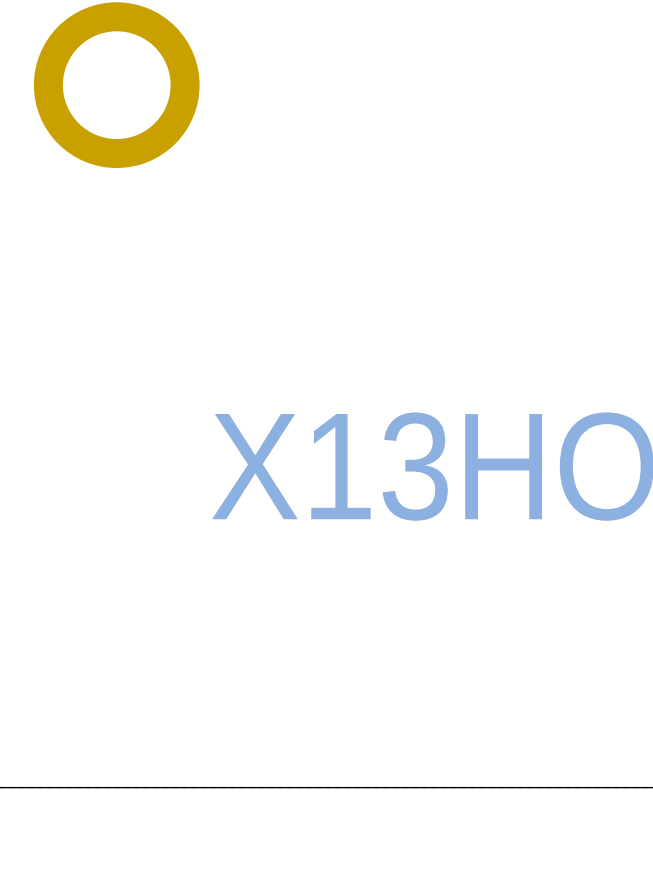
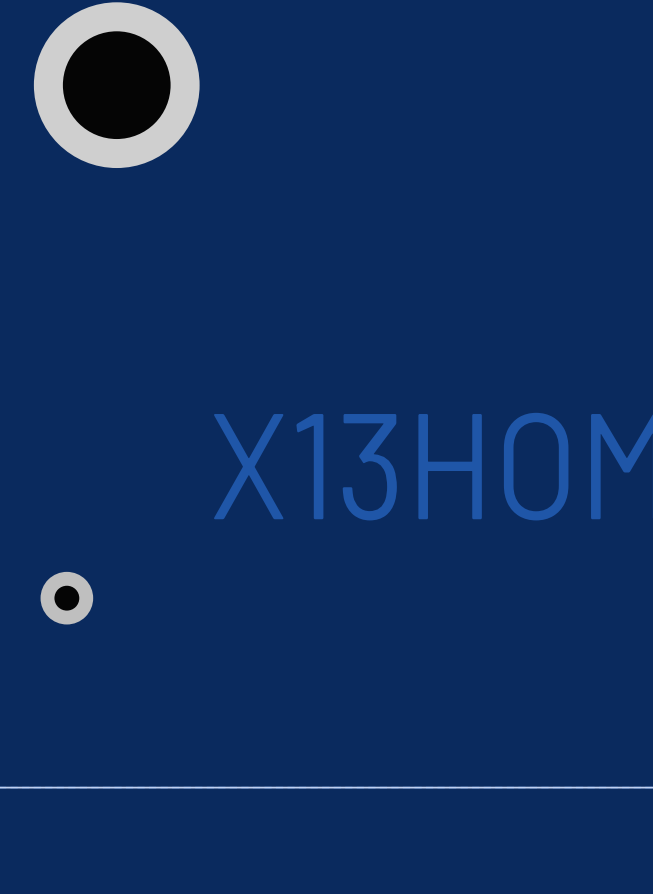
via: none -> (66, 598)

